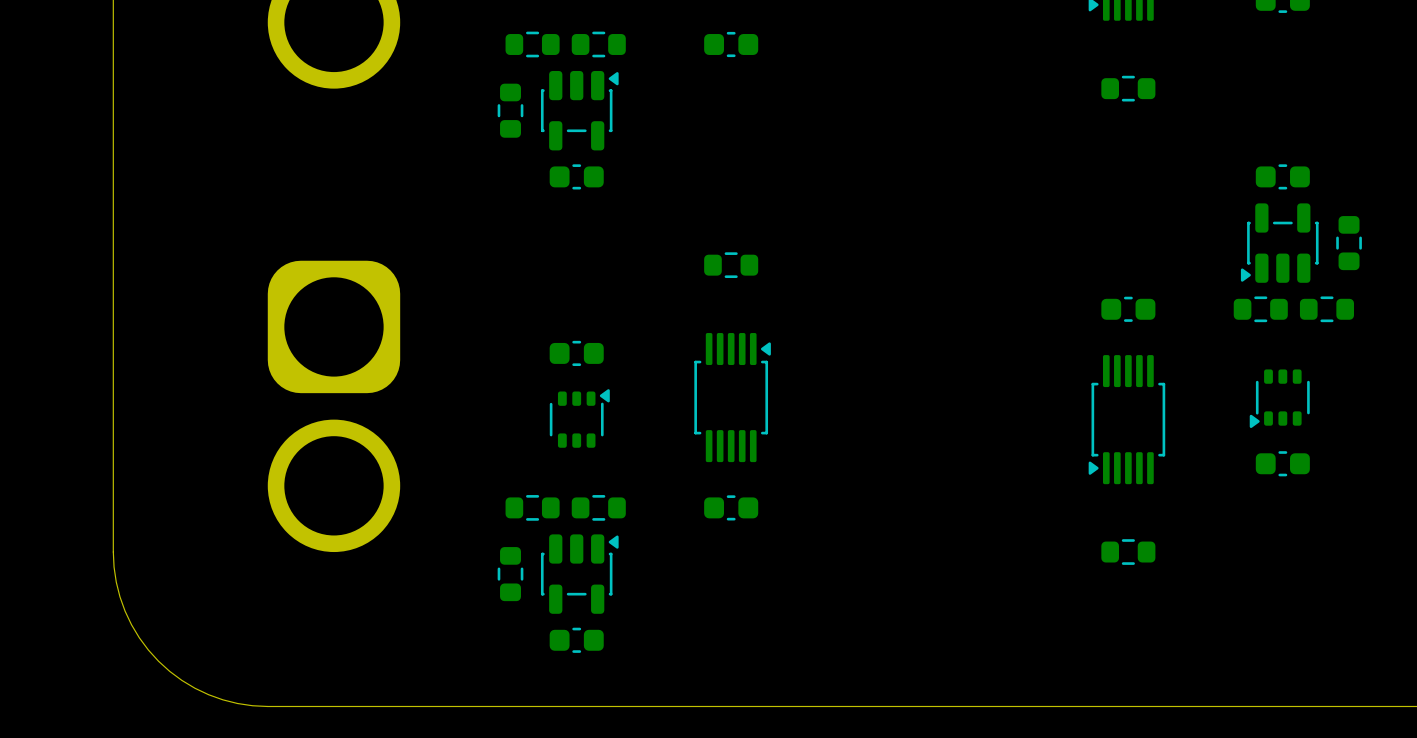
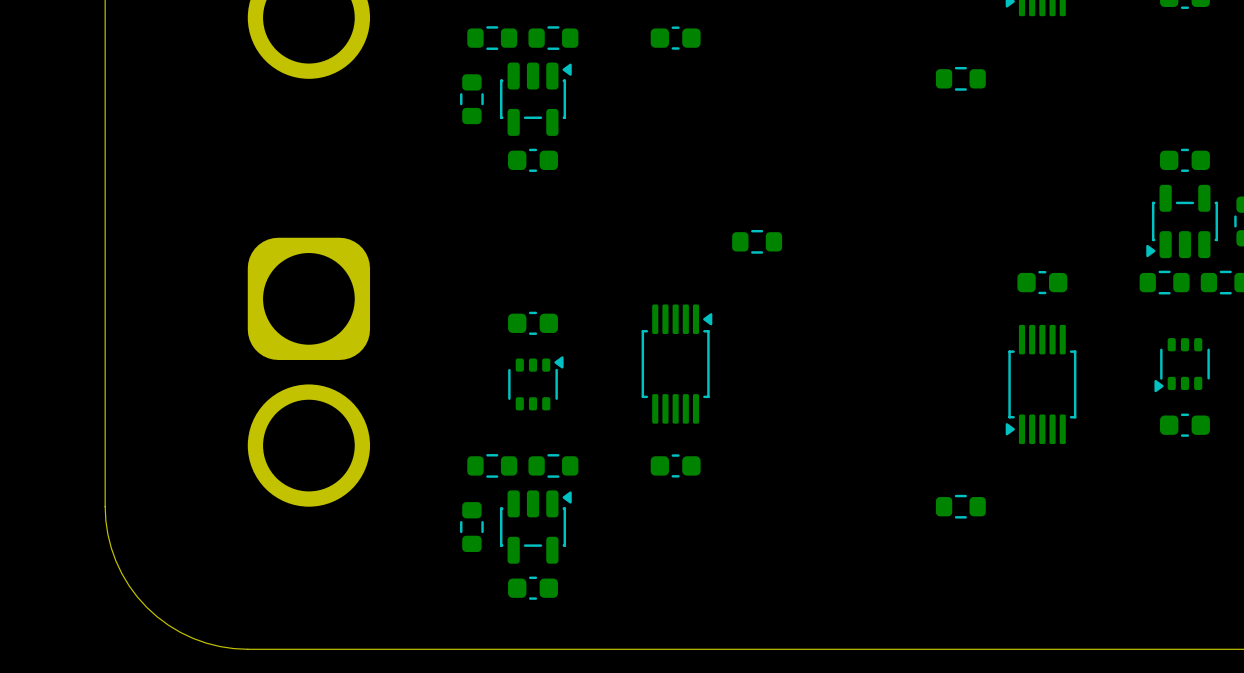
part position: (1128, 88) -> (960, 78)
part position: (731, 265) -> (757, 241)
part position: (1128, 552) -> (960, 506)

